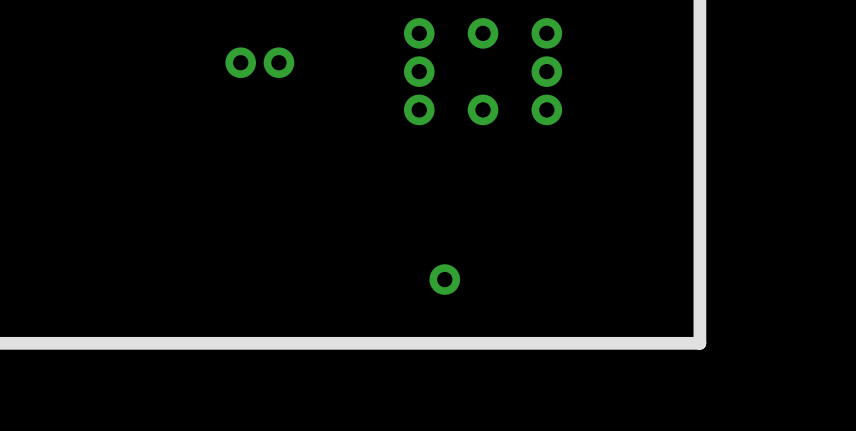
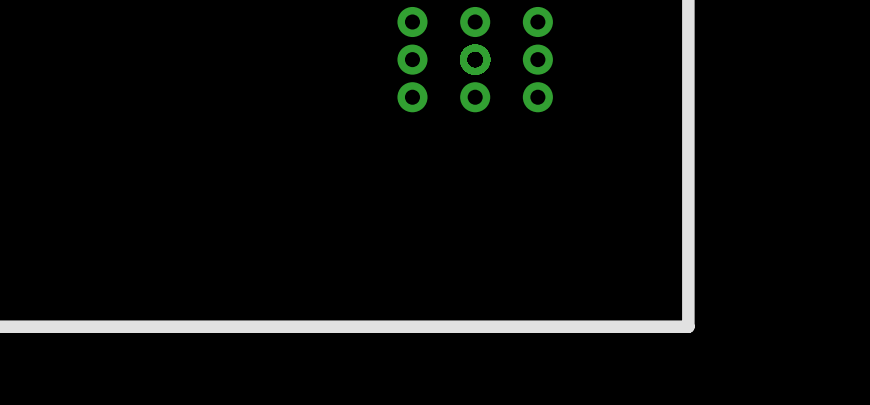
via: (240, 62) -> none
via: (278, 62) -> none
via: none -> (475, 59)
via: (444, 279) -> none

